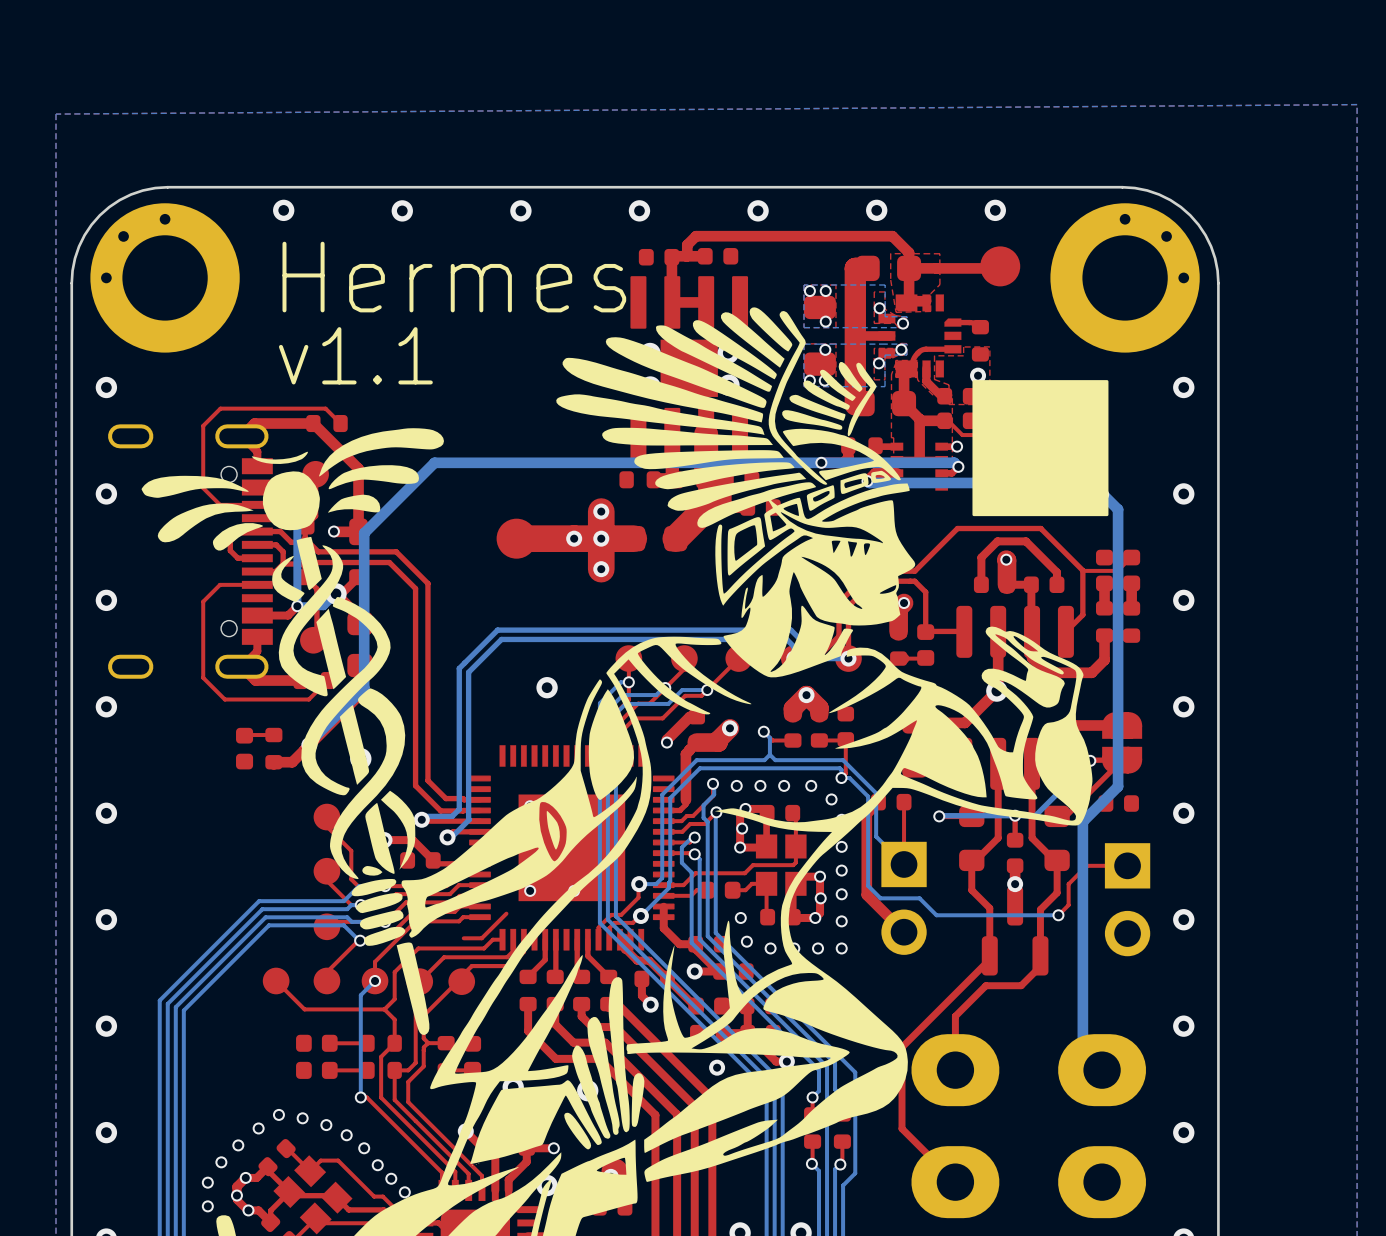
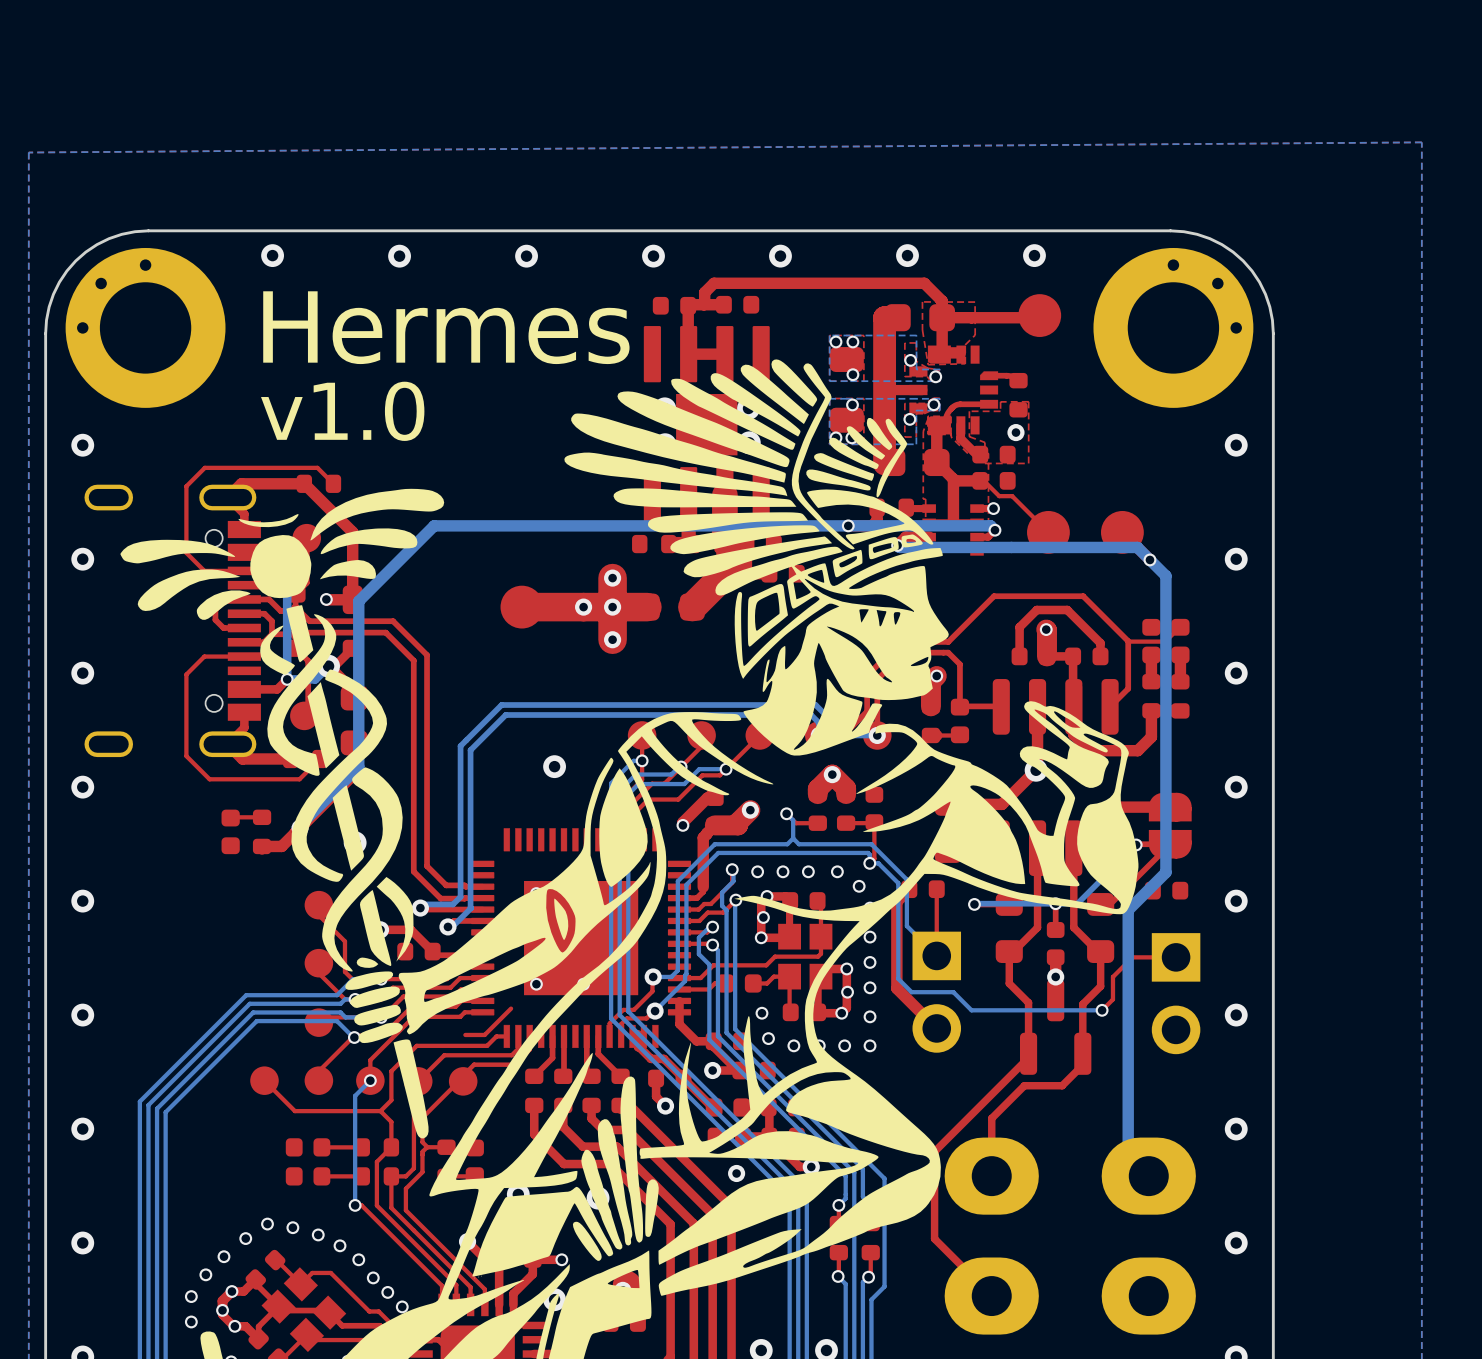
text: v1.1 (355, 355) -> v1.0 (342, 411)
drawing: [972, 380, 1109, 517] -> none

